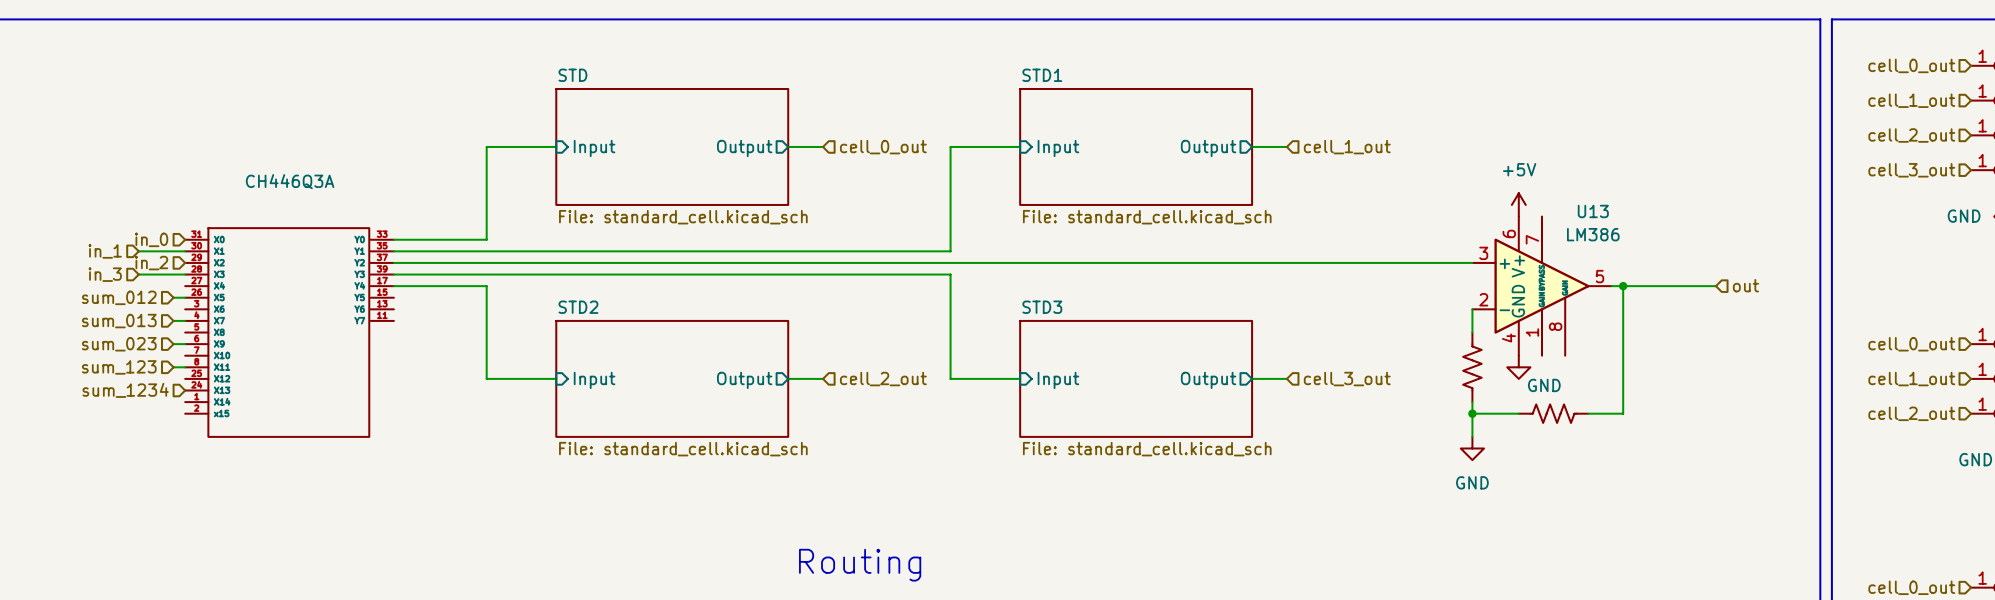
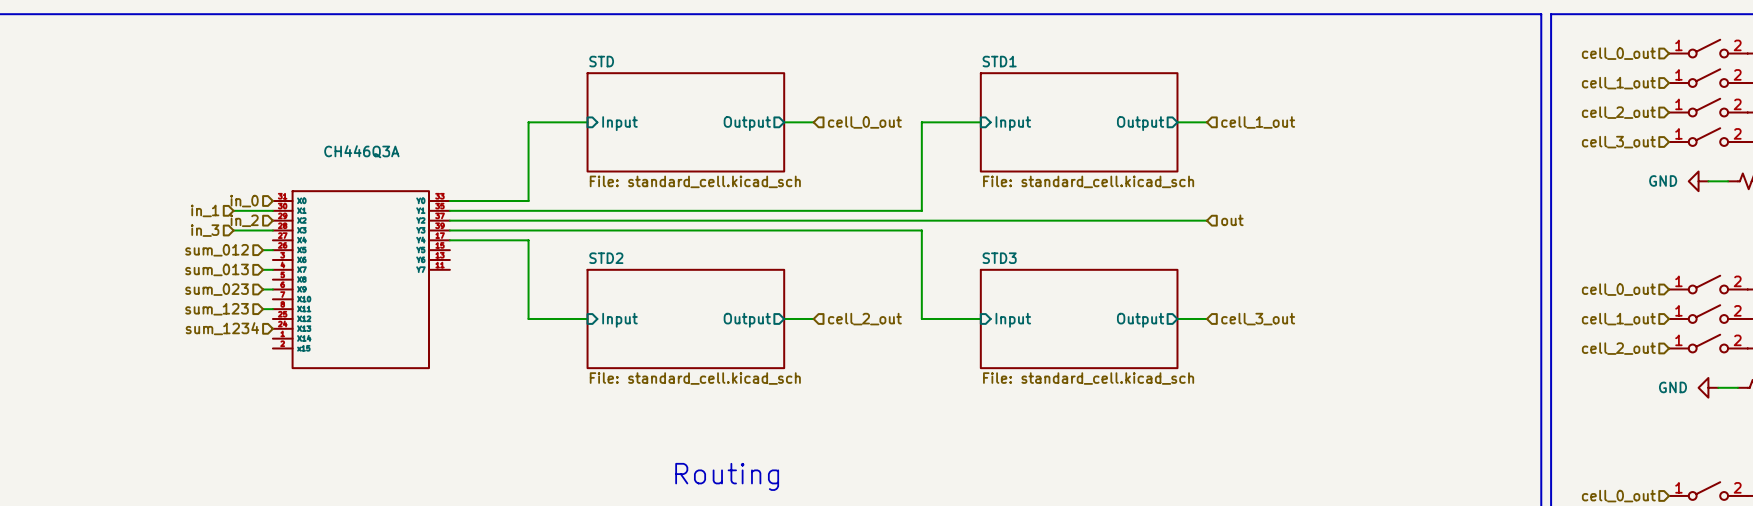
wire: (556, 146) (486, 146) (486, 239) (393, 239) -> (587, 122) (528, 122) (528, 201) (449, 201)
sheet STD position: (672, 146) -> (685, 122)
wire: (788, 146) (823, 146) -> none
wire: (950, 146) (950, 251) -> (803, 122) (784, 122)
wire: (962, 146) (1020, 146) -> none
sheet STD1 position: (1136, 146) -> (1079, 122)
wire: none -> (980, 122) (921, 122) (921, 210) (803, 210)
wire: (1252, 146) (1286, 146) -> (1177, 122) (1206, 122)
hierarchical label position: cell_0_out (883, 147) -> cell_0_out (864, 122)
hierarchical label position: cell_1_out (1347, 147) -> cell_1_out (1258, 122)
sheet pin: Input (594, 148) -> none
sheet pin: none -> Input (620, 123)
sheet pin: Output (744, 148) -> none
sheet pin: none -> Output (747, 123)
sheet pin: Input (1058, 148) -> none
sheet pin: none -> Input (1013, 123)
sheet pin: Output (1208, 148) -> none
sheet pin: none -> Output (1140, 123)
power symbol: +5V (1518, 204) -> none
hierarchical label position: in_0 (151, 239) -> in_0 (244, 201)
hierarchical label position: in_1 (105, 251) -> in_1 (205, 210)
wire: (138, 251) (185, 251) -> (233, 210) (272, 210)
wire: (393, 251) (533, 251) -> none
wire: (393, 262) (533, 262) -> none
wire: (1426, 262) (1472, 262) -> none
hierarchical label: none -> out (1232, 220)
hierarchical label position: in_2 (151, 263) -> in_2 (244, 220)
hierarchical label position: in_3 (105, 274) -> in_3 (205, 230)
wire: (138, 274) (185, 274) -> (233, 230) (272, 230)
wire: (393, 274) (533, 274) -> none
wire: (950, 274) (950, 378) -> (784, 318) (803, 318)
wire: none -> (803, 230) (921, 230) (921, 318) (980, 318)
hierarchical label: out (1745, 285) -> none
wire: (393, 286) (486, 286) (486, 378) (556, 378) -> (449, 240) (528, 240) (528, 318) (587, 318)
U13: LM386 (1542, 286) -> none
wire: (1611, 286) (1715, 286) -> none
wire: (1623, 286) (1623, 413) (1588, 413) -> none
junction: (1623, 286) -> none
hierarchical label position: sum_012 (119, 297) -> sum_012 (217, 250)
wire: (173, 297) (185, 297) -> (263, 250) (272, 250)
wire: (1472, 309) (1472, 332) -> none
wire: (173, 320) (185, 320) -> (263, 269) (272, 269)
hierarchical label position: sum_013 (119, 321) -> sum_013 (217, 269)
CH446Q3A position: (289, 332) -> (361, 279)
hierarchical label position: sum_023 (119, 344) -> sum_023 (217, 289)
wire: (173, 344) (185, 344) -> (263, 289) (272, 289)
hierarchical label position: sum_123 (119, 367) -> sum_123 (217, 309)
wire: (173, 367) (185, 367) -> (263, 309) (272, 309)
part: (1472, 367) -> none
power symbol: GND (1518, 367) -> none
sheet STD2 position: (672, 378) -> (685, 318)
wire: (788, 378) (823, 378) -> none
wire: (962, 378) (1020, 378) -> none
sheet STD3 position: (1136, 378) -> (1079, 318)
wire: (1252, 378) (1286, 378) -> (1177, 318) (1206, 318)
hierarchical label position: cell_2_out (883, 379) -> cell_2_out (864, 319)
hierarchical label position: cell_3_out (1347, 379) -> cell_3_out (1258, 319)
sheet pin: Input (594, 380) -> none
sheet pin: none -> Input (620, 320)
sheet pin: Output (744, 380) -> none
sheet pin: none -> Output (747, 320)
sheet pin: Input (1058, 380) -> none
sheet pin: none -> Input (1013, 320)
sheet pin: Output (1208, 380) -> none
sheet pin: none -> Output (1140, 320)
hierarchical label position: sum_1234 (125, 390) -> sum_1234 (222, 328)
wire: (1472, 402) (1472, 436) -> none
wire: (1472, 413) (1518, 413) -> none
junction: (1472, 413) -> none
part: (1553, 413) -> none
power symbol: GND (1472, 448) -> none

